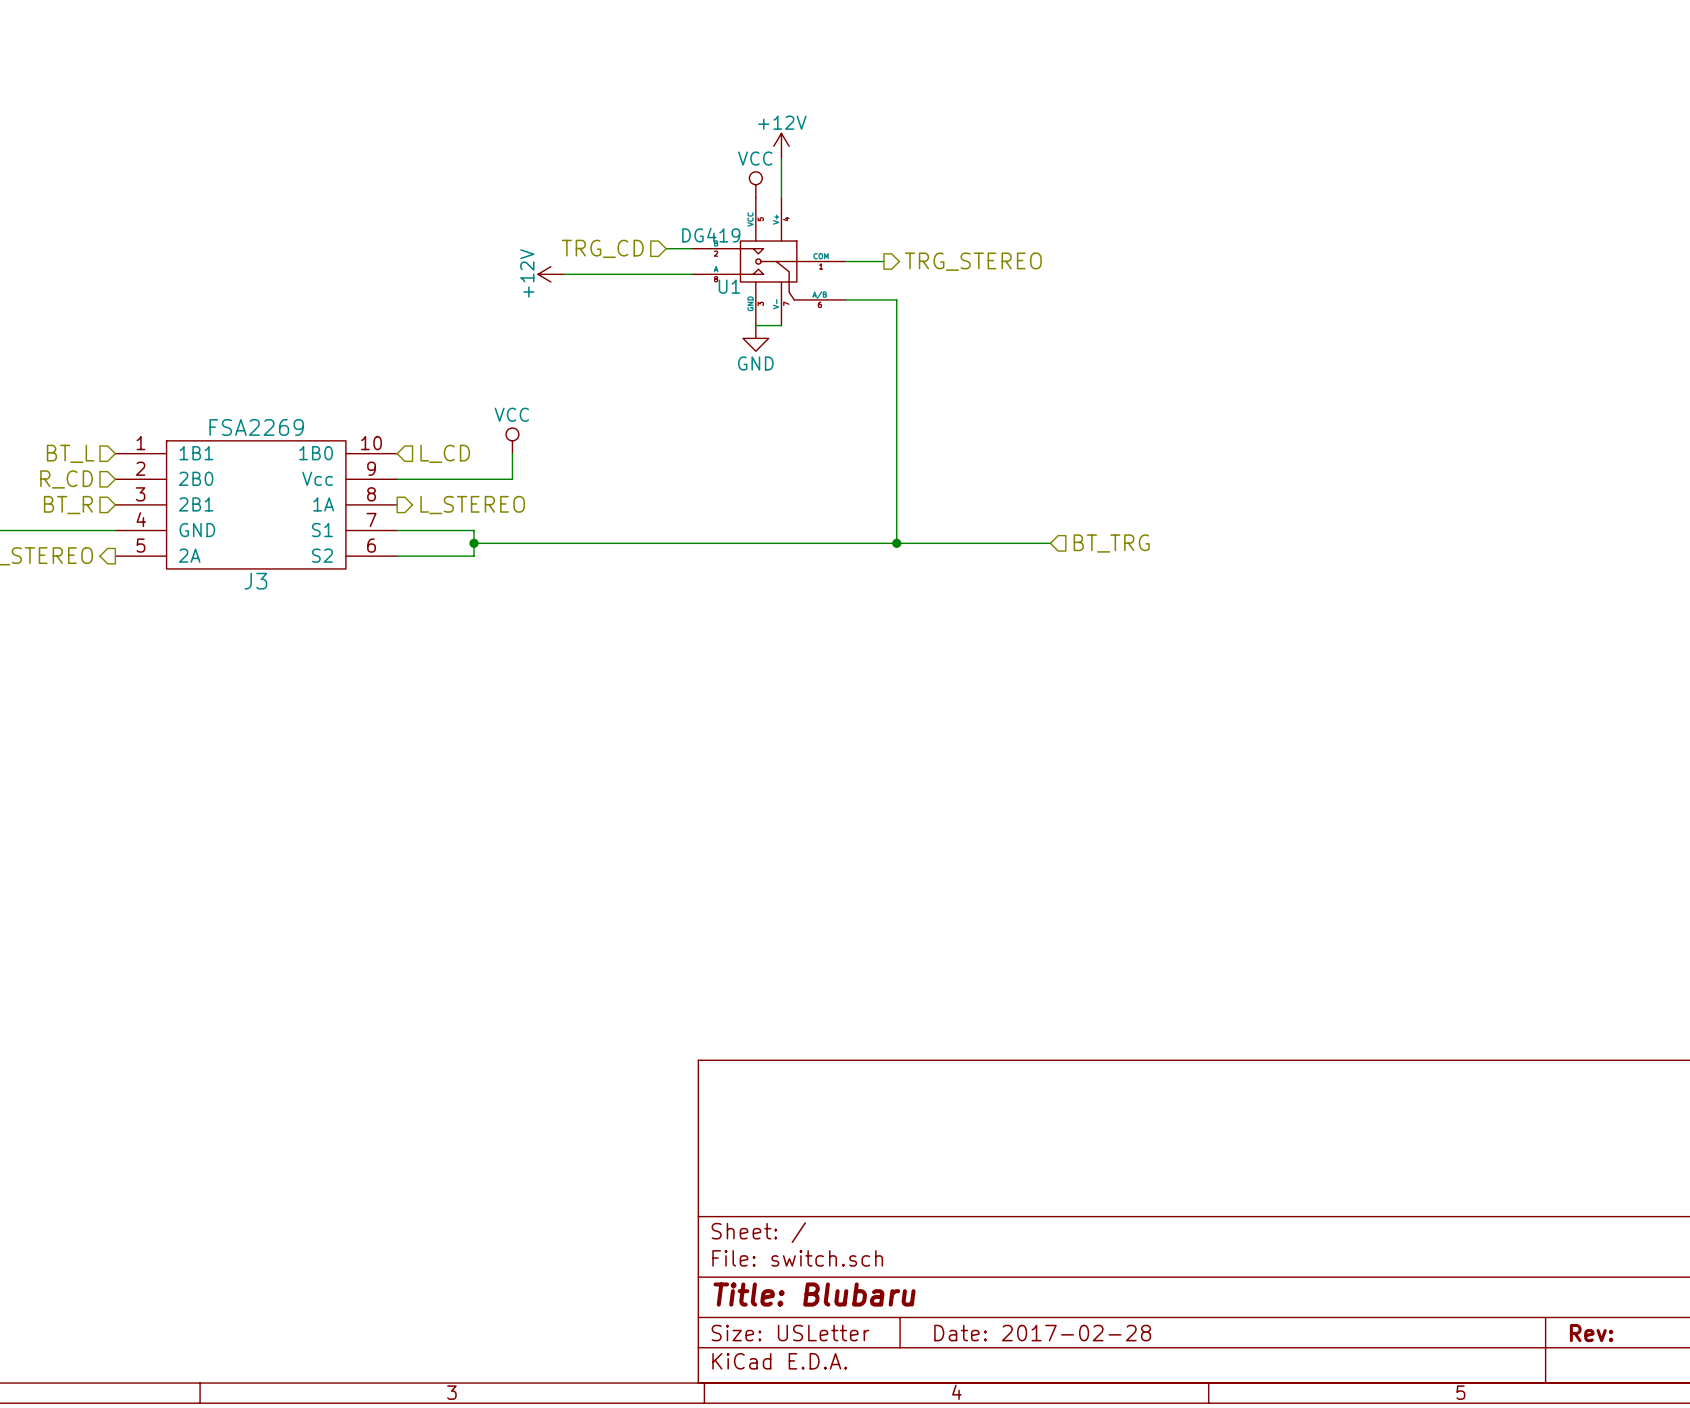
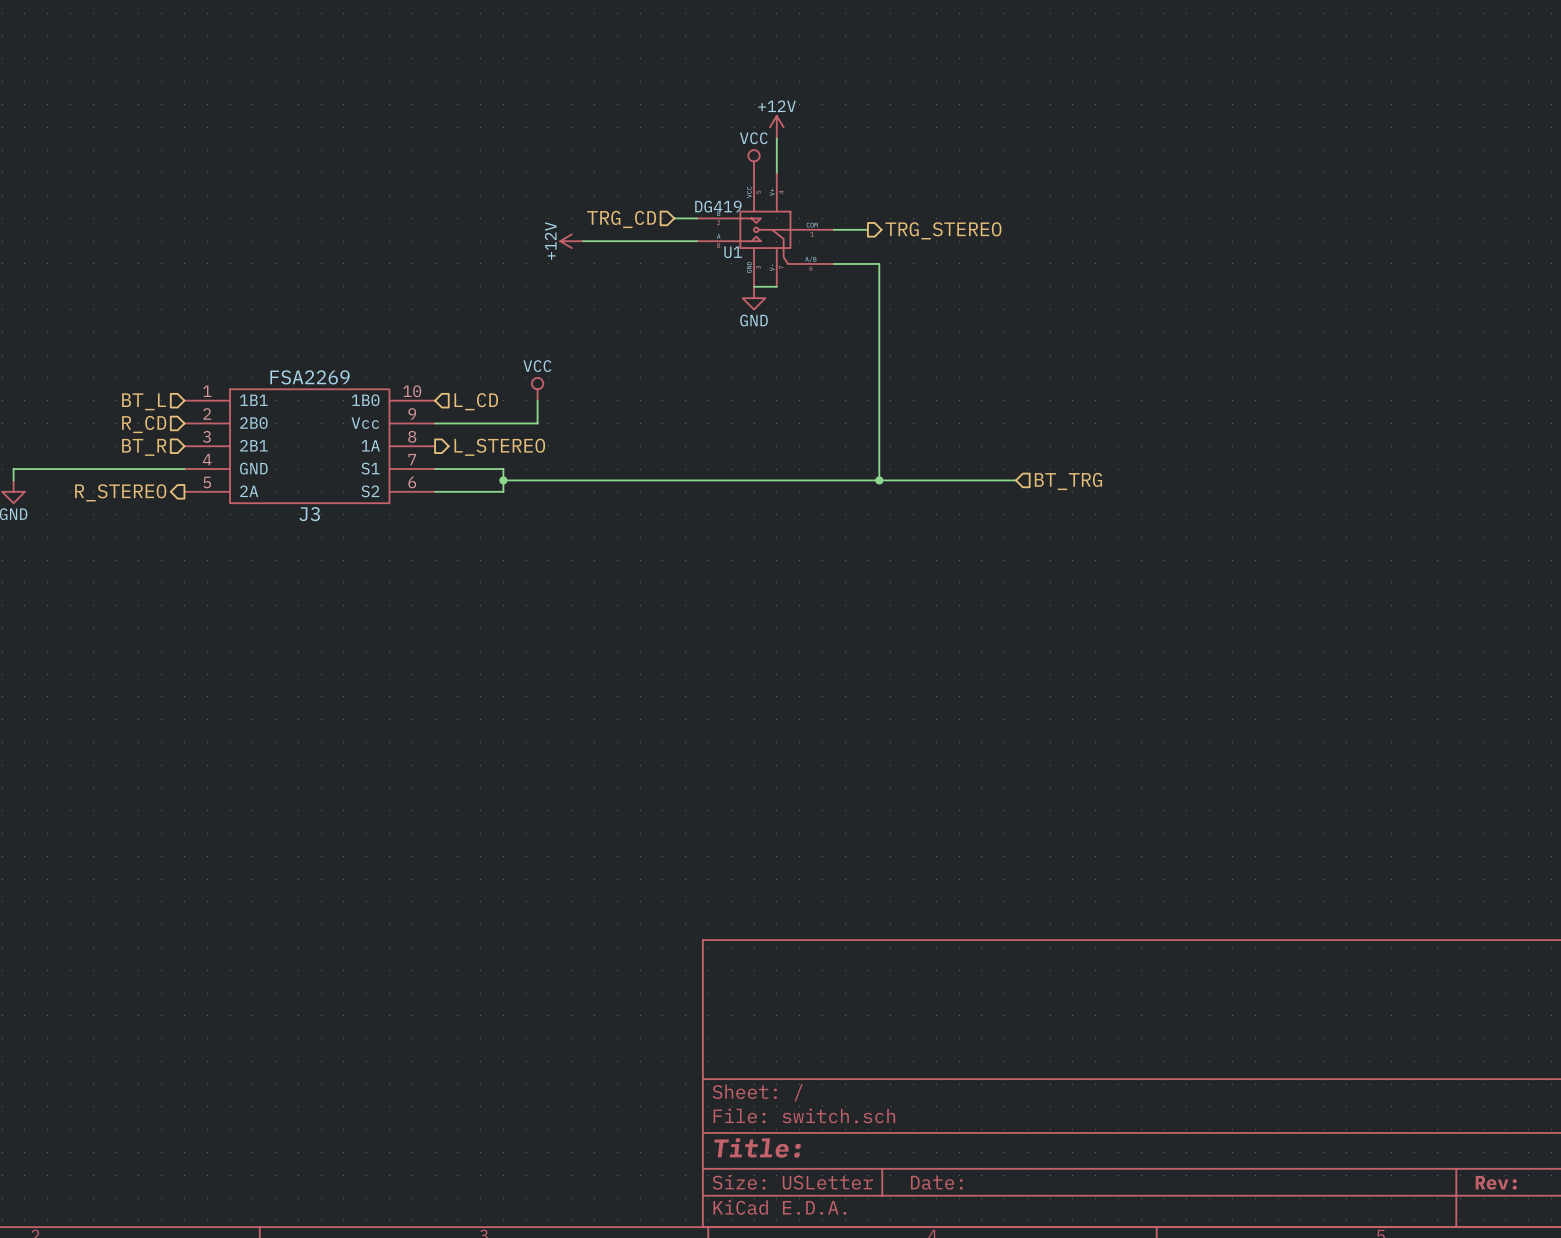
title block: Title: Blubaru (814, 1294) -> Title: (757, 1147)
title block: Date: 2017-02-28 (1042, 1333) -> Date: (936, 1182)

